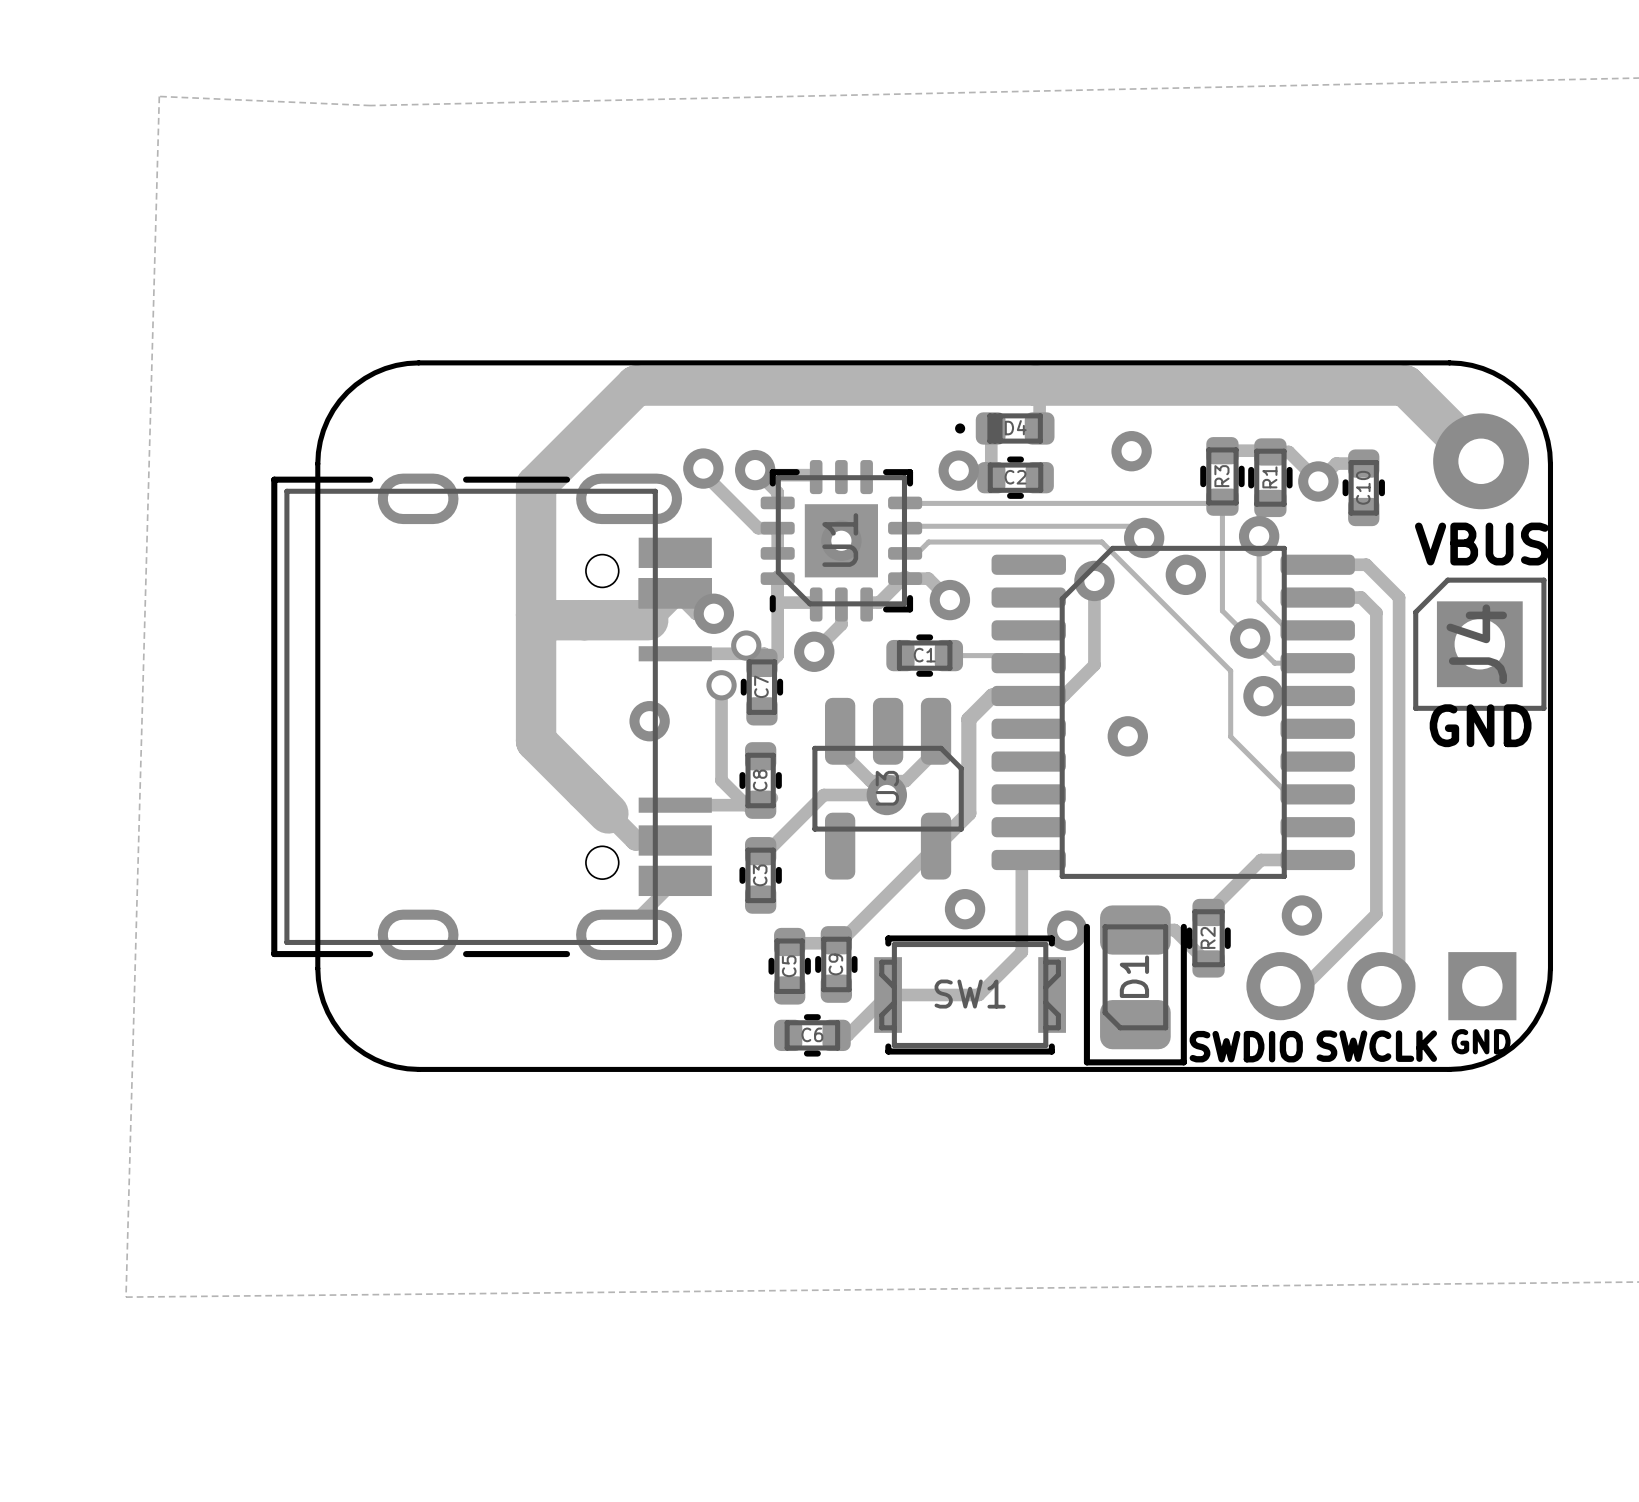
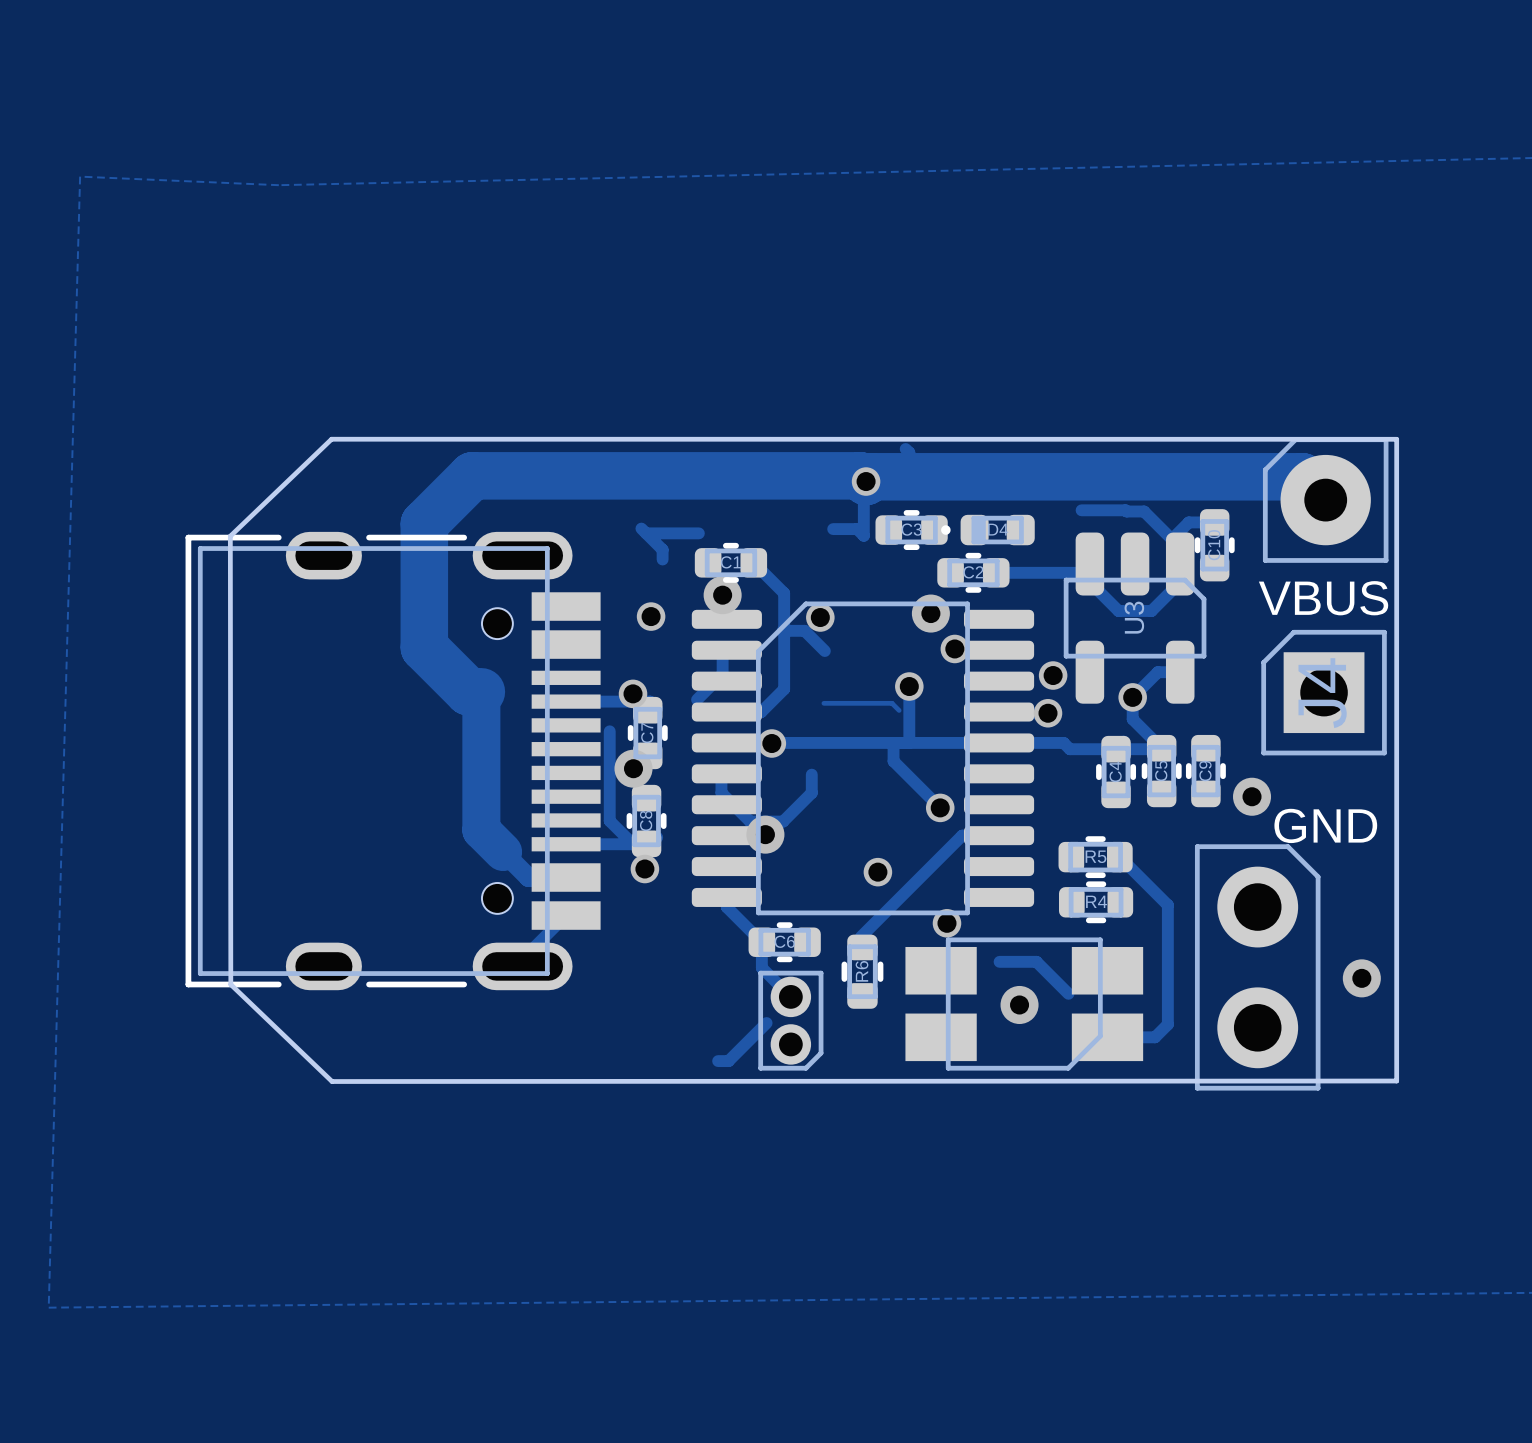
board edge: (418, 362) (1449, 362) (1472, 365) (1503, 378) (1520, 392) (1535, 410) (1544, 430) (1550, 463) (1550, 968) (1547, 990) (1535, 1022) (1520, 1039) (1493, 1059) (1472, 1066) (1449, 1069) (418, 1069) (396, 1066) (365, 1053) (347, 1039) (333, 1022) (323, 1001) (318, 979) (318, 452) (323, 430) (333, 410) (355, 384) (385, 368) (418, 362) -> (331, 439) (230, 536) (230, 984) (332, 1081) (1396, 1081) (1396, 439) (331, 439)
part footprint: [1433, 413, 1530, 510] -> [1262, 437, 1389, 563]
via: none -> (866, 481)
D4 position: (1004, 428) -> (987, 530)
via: (1131, 451) -> none
track: (1481, 461) (1405, 385) (636, 385) (536, 485) (536, 741) (585, 790) -> (1325, 500) (1302, 476) (870, 476) (866, 481) (860, 475) (472, 475) (424, 523) (424, 647) (468, 691) (481, 691) (481, 830)
track: (703, 468) (703, 473) (758, 528) (777, 528) (777, 553) -> none
via: (703, 468) -> none
via: (755, 470) -> none
via: (958, 470) -> none
part footprint: [271, 473, 712, 961] -> [185, 531, 601, 991]
R3: (1222, 476) -> none
C2 position: (1015, 477) -> (973, 572)
R1: (1270, 477) -> none
via: (1318, 481) -> none
track: (905, 503) (1222, 502) (1222, 610) (1274, 663) (1317, 663) -> none
track: (1270, 503) (1259, 514) (1259, 601) (1288, 630) (1317, 630) -> none
track: none -> (753, 562) (784, 593) (784, 689) (761, 712) (726, 712)
track: none -> (1180, 564) (1180, 582) (1151, 610) (1118, 610) (1089, 582) (1089, 564) (1081, 572) (996, 571)
track: (905, 526) (1132, 526) (1144, 537) -> none
via: (1259, 536) -> none
via: (1144, 537) -> none
part: (841, 540) -> none
track: (905, 551) (919, 551) (928, 542) (1101, 542) (1230, 670) (1230, 736) (1288, 794) (1317, 794) -> none
via: none -> (651, 616)
via: none -> (820, 617)
track: (1317, 564) (1366, 564) (1399, 597) (1399, 968) (1381, 986) -> none
via: (1185, 574) -> none
track: (777, 576) (777, 655) (771, 661) -> none
track: (905, 576) (879, 602) (866, 602) -> none
track: (1094, 580) (1094, 665) (1063, 695) (994, 695) -> none
via position: (1094, 580) -> (930, 613)
via: none -> (954, 648)
track: (1317, 597) (1361, 597) (1376, 612) (1376, 914) (1304, 986) (1280, 986) -> none
via: (949, 600) -> none
track: (777, 602) (816, 602) -> none
track: (713, 613) (695, 613) (675, 593) (648, 620) (541, 620) (536, 615) -> none
via: (713, 613) -> none
track: none -> (1180, 672) (1157, 672) (1132, 697) (1132, 719) (1160, 749) (1069, 749) (1063, 742) (726, 742)
via: none -> (1053, 675)
track: none -> (909, 686) (909, 742)
via: none -> (909, 686)
via position: (1250, 638) -> (1132, 697)
via: (814, 651) -> none
C1 position: (924, 655) -> (730, 562)
via: none -> (1048, 713)
via: (721, 685) -> none
track: (999, 695) (1028, 695) (992, 695) (968, 719) (968, 813) (936, 846) -> none
via: (1263, 696) -> none
track: none -> (893, 742) (893, 761) (940, 807)
via: none -> (771, 743)
part position: (1173, 712) -> (862, 758)
via: (649, 721) -> none
via: none -> (633, 768)
text position: GND (1480, 725) -> GND (1325, 825)
C4: none -> (1116, 772)
via: (1127, 736) -> none
via: none -> (1252, 796)
via: none -> (940, 807)
track: (886, 781) (886, 794) (823, 794) (767, 851) (760, 851) -> none
U3 position: (888, 788) -> (1135, 618)
track: none -> (999, 834) (962, 835) (860, 937)
track: (967, 814) (838, 943) (787, 943) -> none
R5: none -> (1095, 857)
track: none -> (1119, 857) (1167, 905) (1167, 1024) (1155, 1037) (1107, 1037)
via: none -> (644, 869)
via: none -> (877, 872)
track: (1028, 859) (1021, 866) (1021, 952) (978, 994) (888, 994) (881, 988) -> none
track: (1317, 859) (1261, 859) (1208, 912) -> none
track: none -> (726, 897) (726, 907) (761, 942) (761, 967) (790, 996)
R4: none -> (1096, 902)
C3 rotation: 0° (760, 875) -> 90° clockwise (911, 530)
C3 position: (760, 875) -> (911, 530)
via: none -> (946, 923)
via: (965, 909) -> none
via: (1301, 915) -> none
via: (1067, 930) -> none
part: none -> (1257, 967)
R2: (1208, 938) -> none
R6: none -> (862, 971)
via: none -> (1361, 978)
C9 position: (836, 964) -> (1205, 771)
C5 position: (789, 966) -> (1161, 771)
part: none -> (1024, 1004)
via: none -> (1019, 1004)
D1: (1135, 985) -> none
part: (1381, 986) -> none
part: none -> (790, 1020)
SW1: (970, 994) -> none
C6 position: (812, 1035) -> (784, 942)
text: GND (1481, 1041) -> none
text: SWDIO (1246, 1046) -> none
text: SWCLK (1376, 1046) -> none

